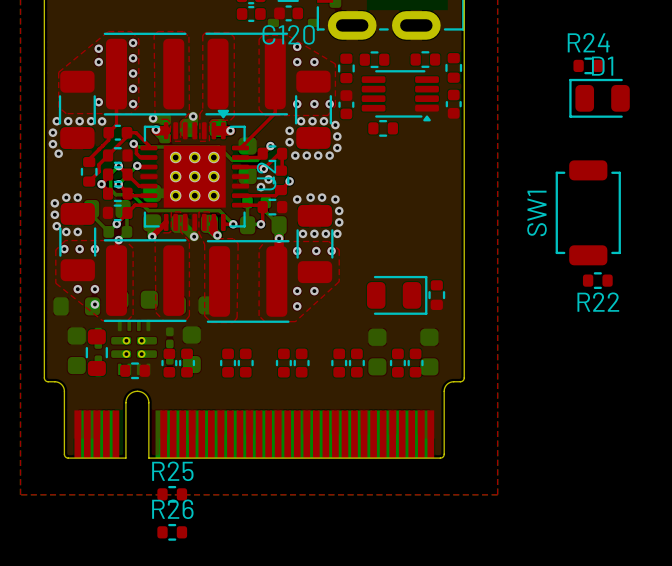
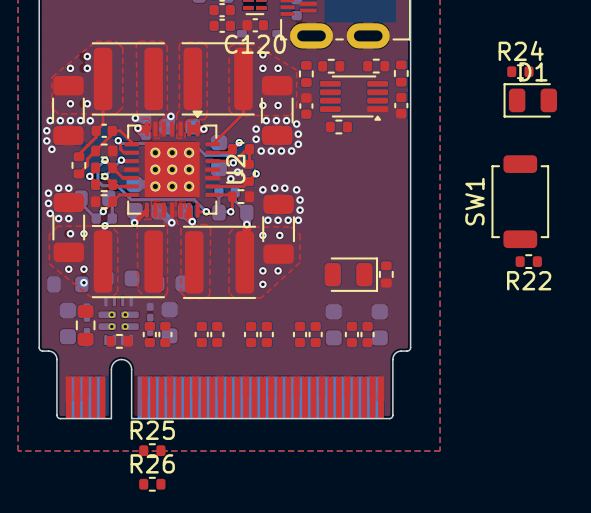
via: (133, 42) -> none
via: (133, 58) -> none
via: none -> (70, 68)
via: (133, 73) -> none
via: (133, 88) -> none
via: none -> (70, 103)
via: (133, 104) -> none
via: (329, 104) -> none
via: (64, 249) -> none
via: (331, 251) -> none

